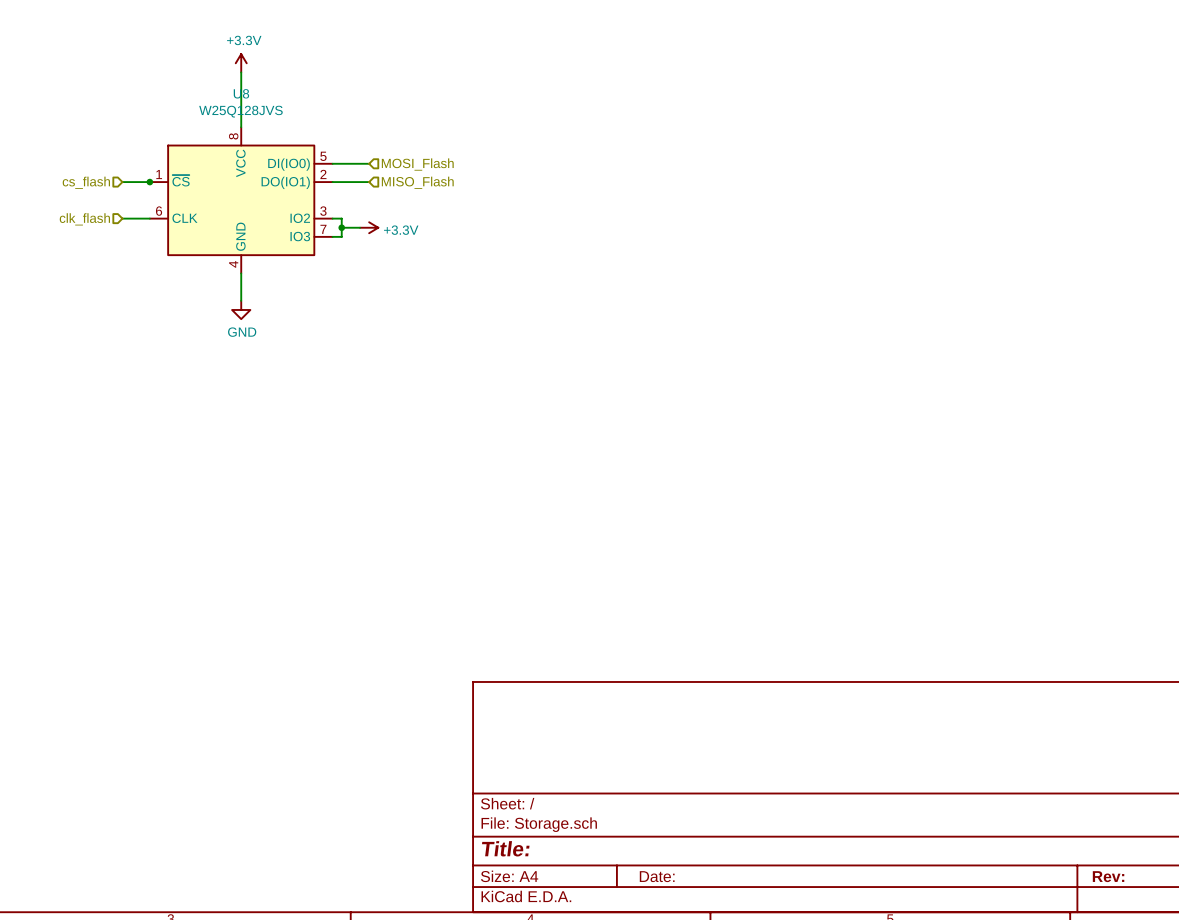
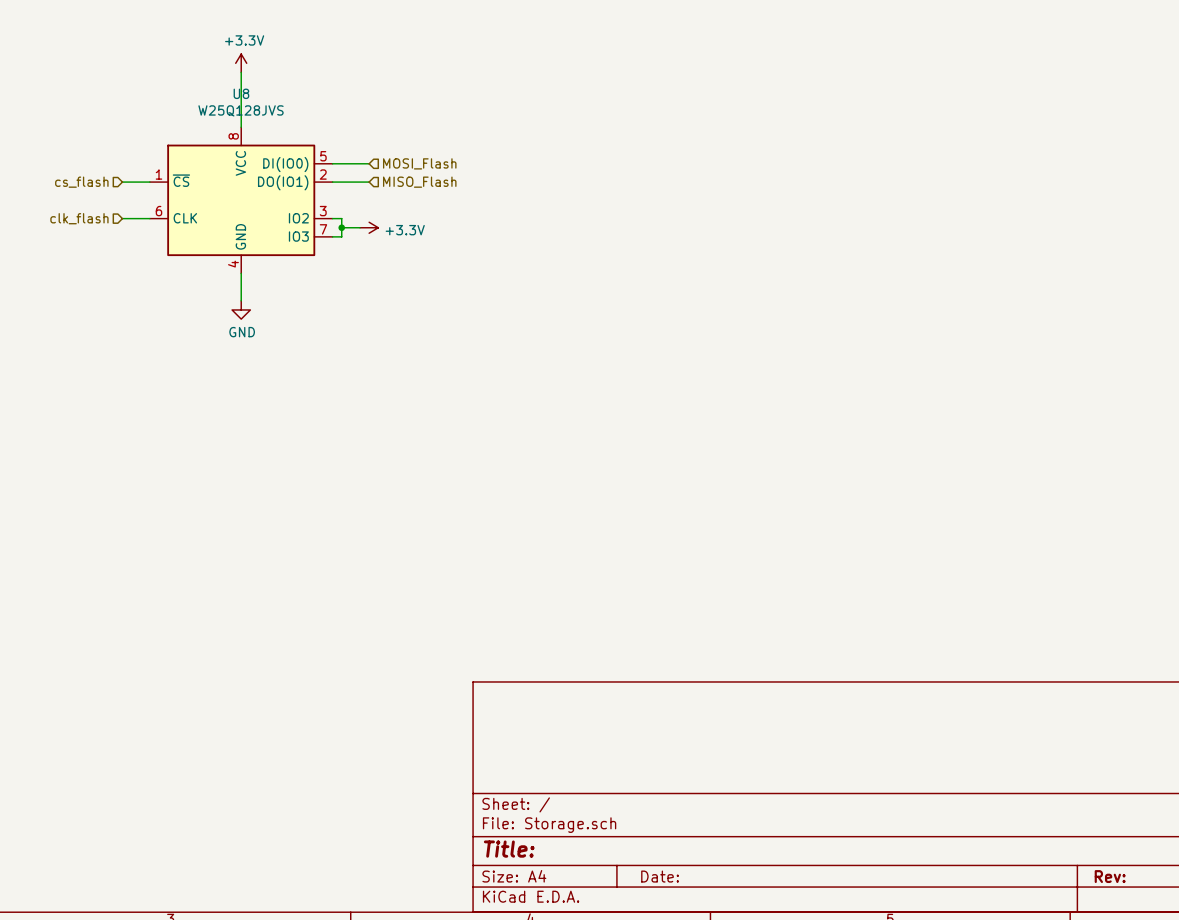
junction: (149, 182) -> none

